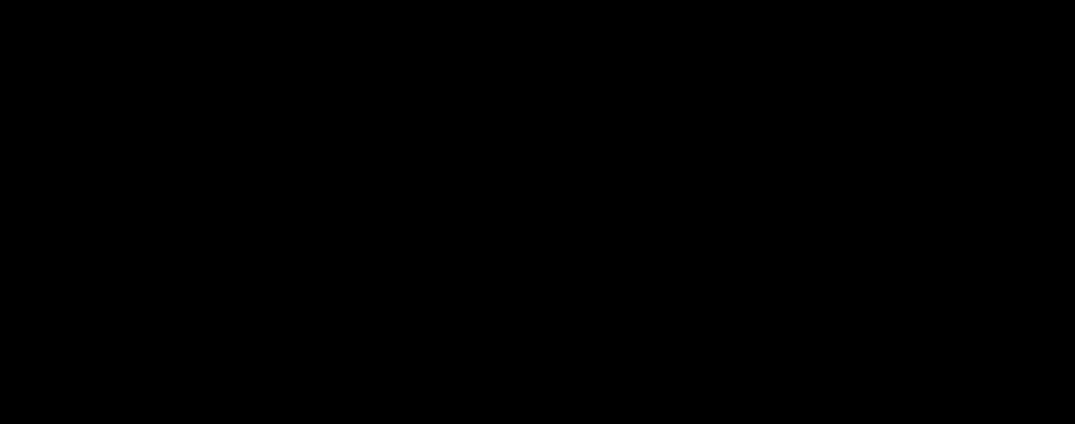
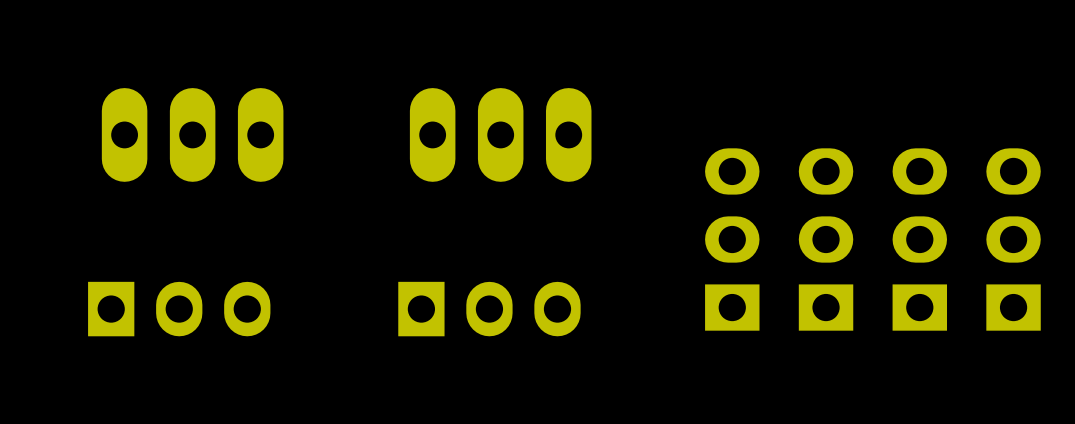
part: none -> (192, 134)
part: none -> (500, 134)
part: none -> (732, 239)
part: none -> (826, 239)
part: none -> (919, 239)
part: none -> (1013, 239)
part: none -> (179, 309)
part: none -> (489, 309)

